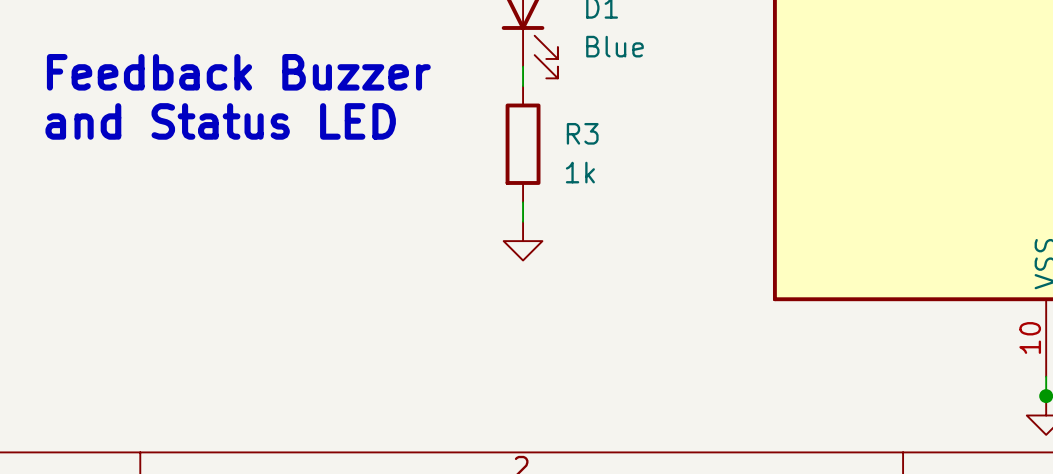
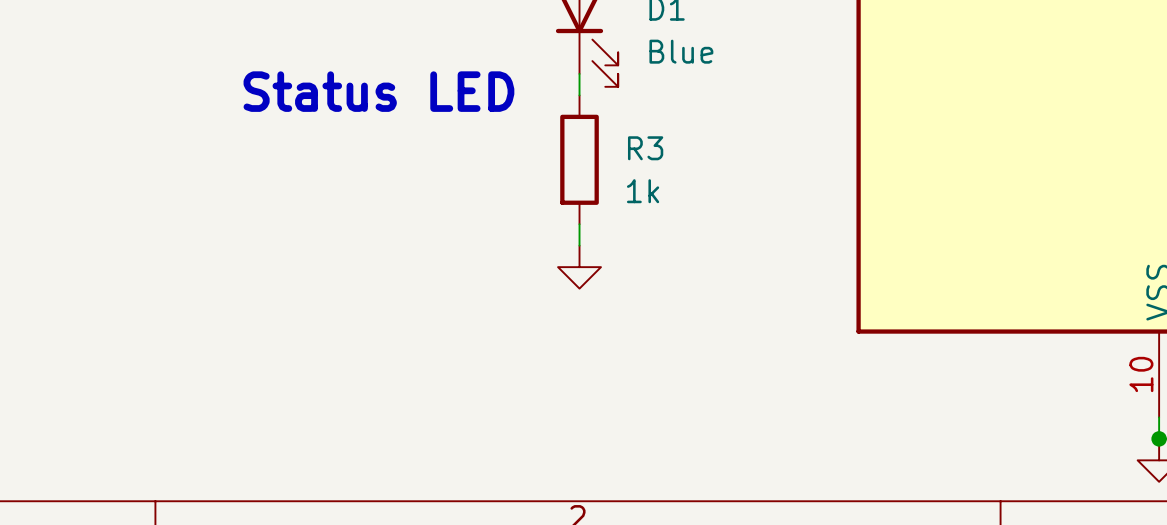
text: Feedback Buzzer (238, 72) -> none
text: and Status LED (220, 121) -> Status LED (378, 91)

